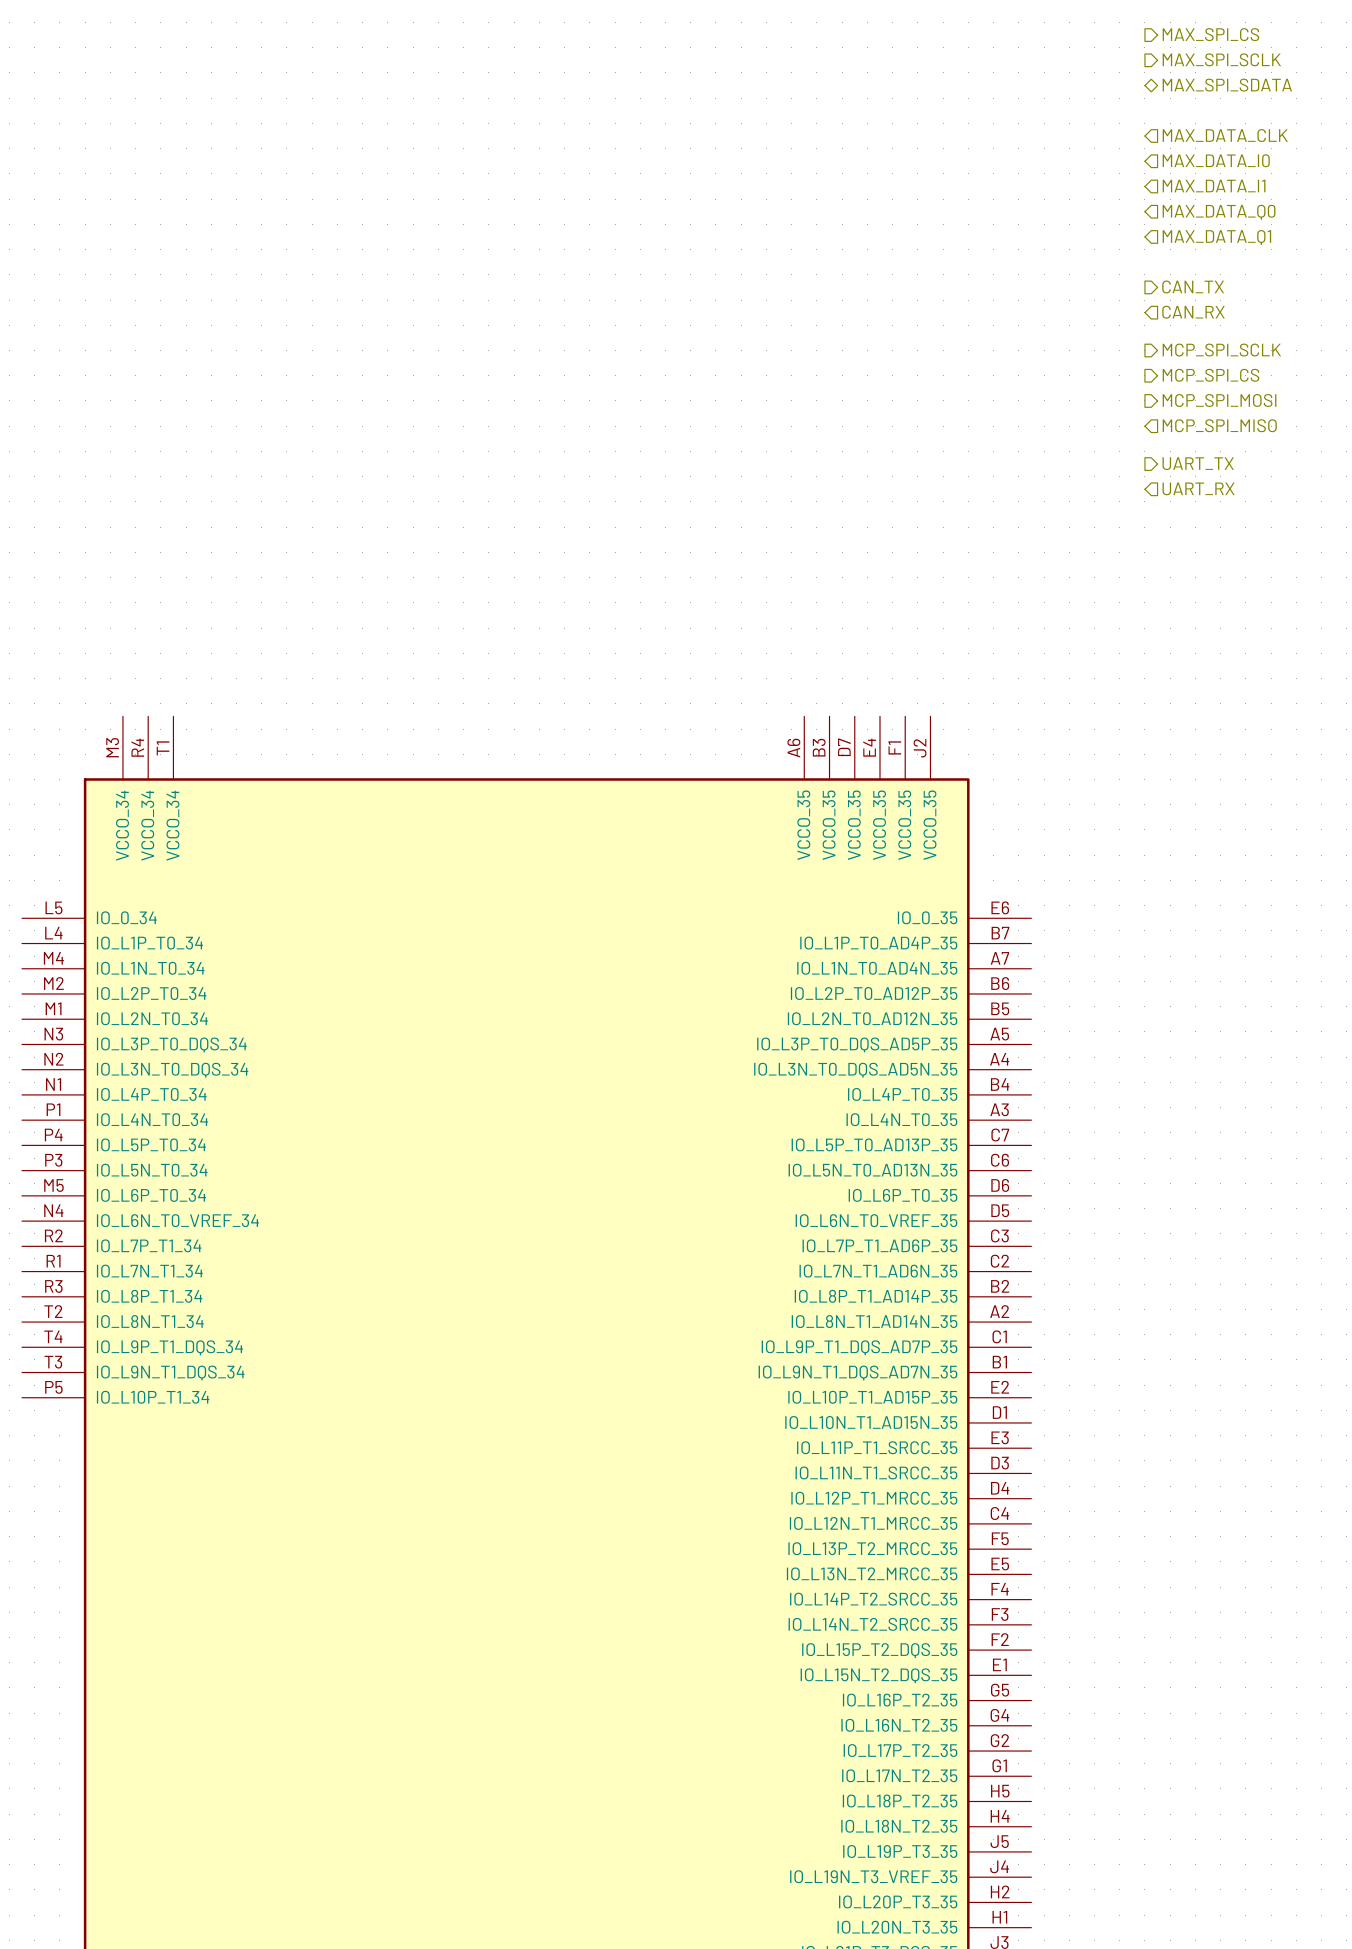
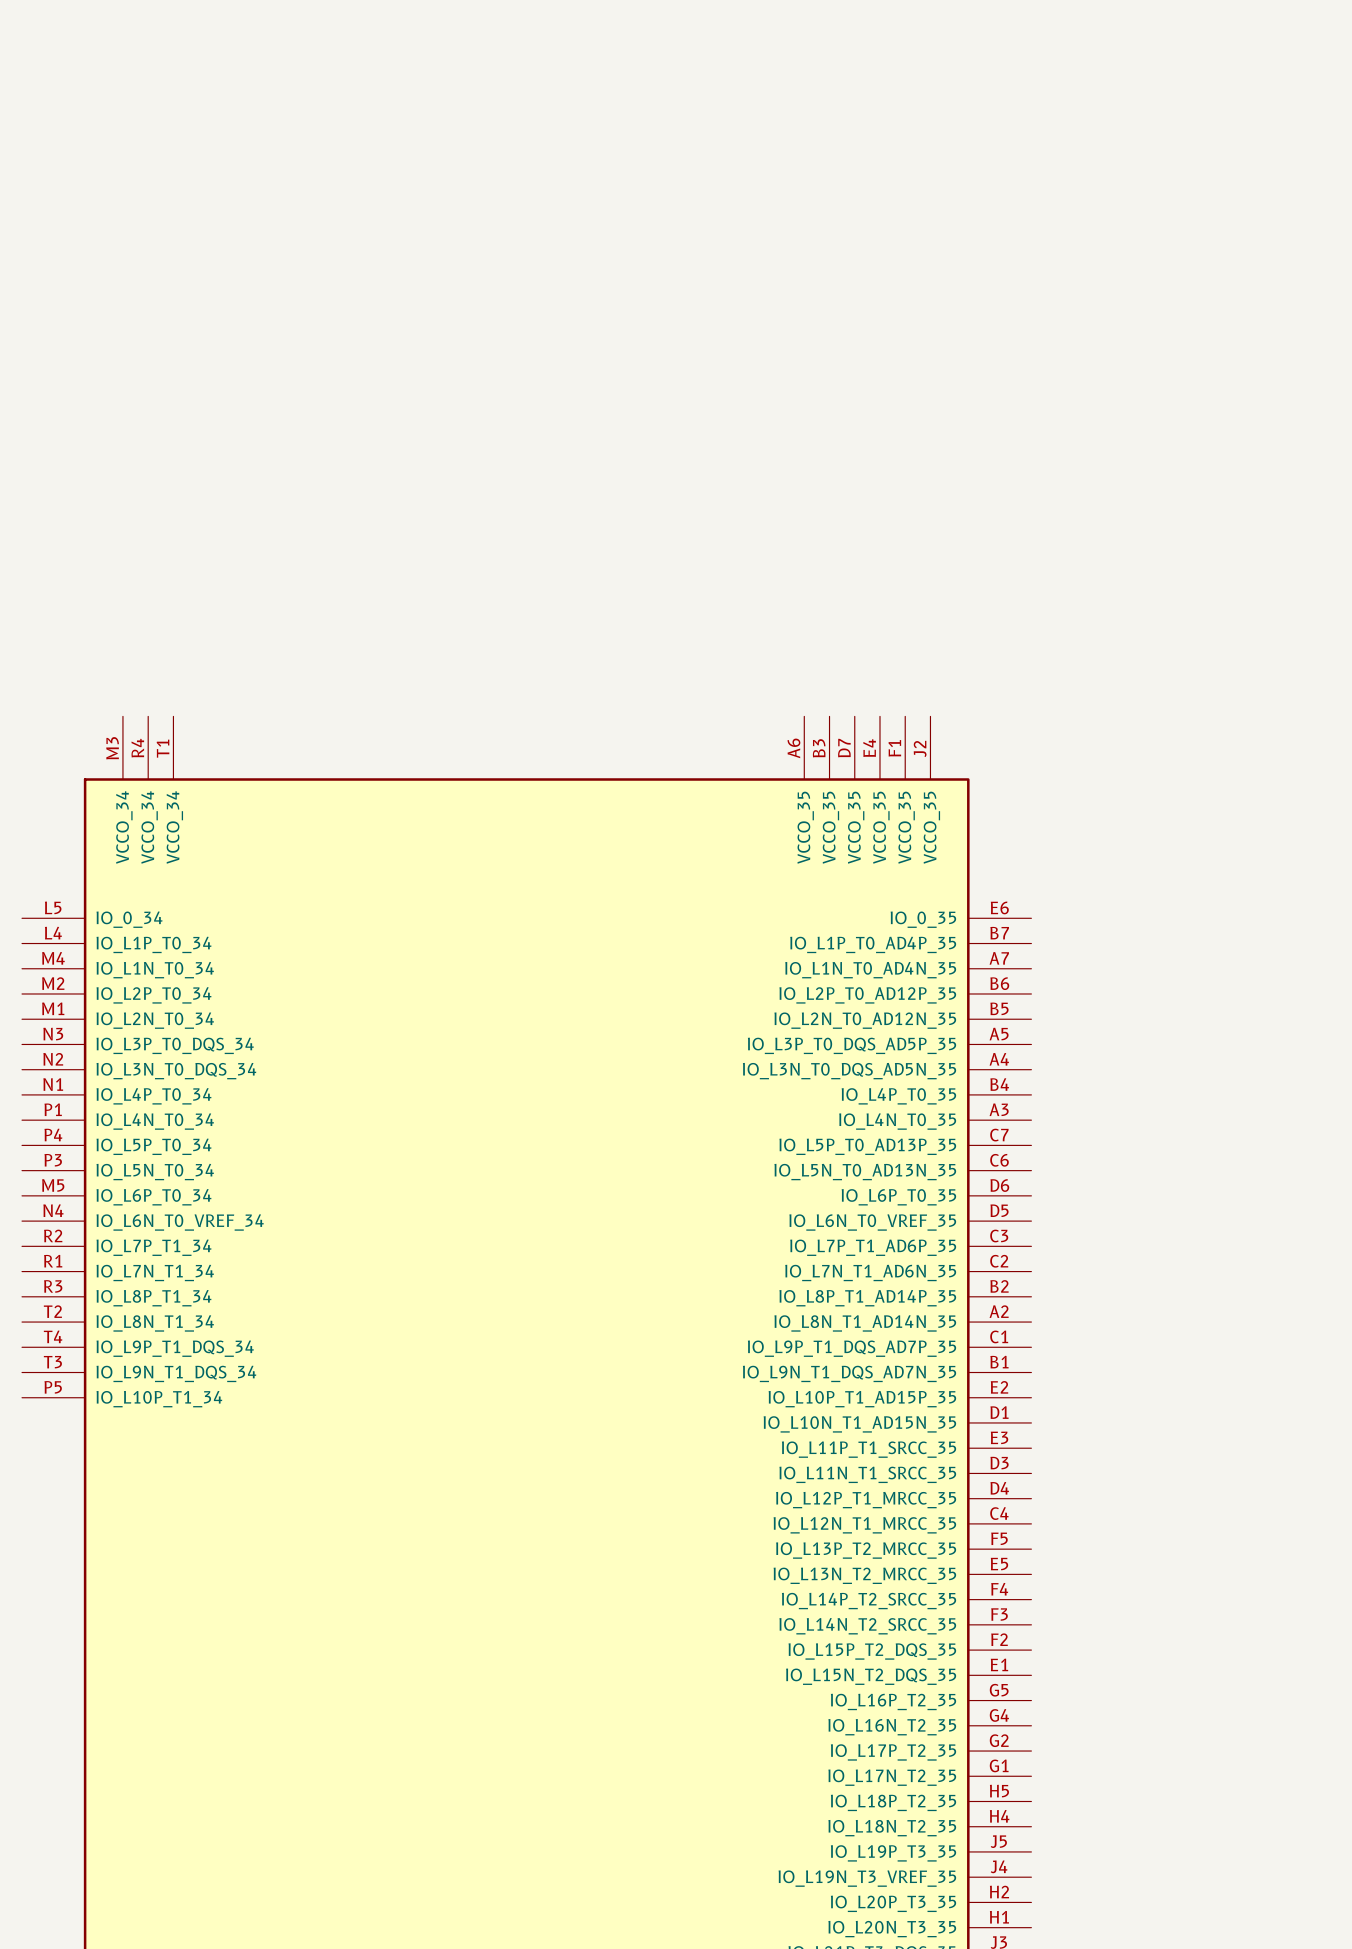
hierarchical label: MAX_SPI_CS (1210, 34) -> none
hierarchical label: MAX_SPI_SCLK (1221, 59) -> none
hierarchical label: MAX_SPI_SDATA (1227, 85) -> none
hierarchical label: MAX_DATA_CLK (1225, 135) -> none
hierarchical label: MAX_DATA_I0 (1216, 160) -> none
hierarchical label: MAX_DATA_I1 (1214, 186) -> none
hierarchical label: MAX_DATA_Q0 (1219, 212) -> none
hierarchical label: MAX_DATA_Q1 (1216, 237) -> none
hierarchical label: CAN_TX (1193, 286) -> none
hierarchical label: CAN_RX (1193, 312) -> none
hierarchical label: MCP_SPI_SCLK (1221, 350) -> none
hierarchical label: MCP_SPI_CS (1210, 375) -> none
hierarchical label: MCP_SPI_MOSI (1219, 400) -> none
hierarchical label: MCP_SPI_MISO (1219, 425) -> none
hierarchical label: UART_TX (1198, 463) -> none
hierarchical label: UART_RX (1198, 488) -> none

